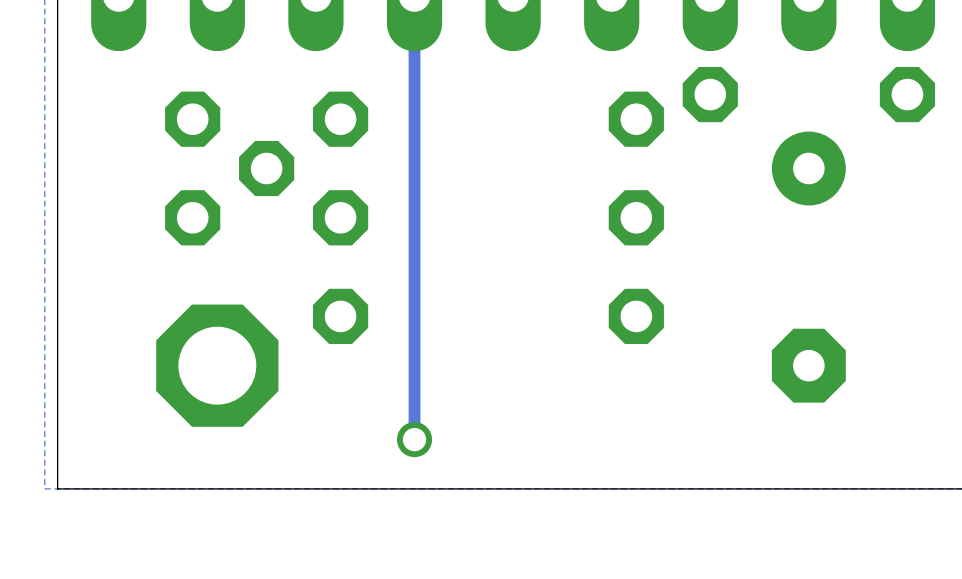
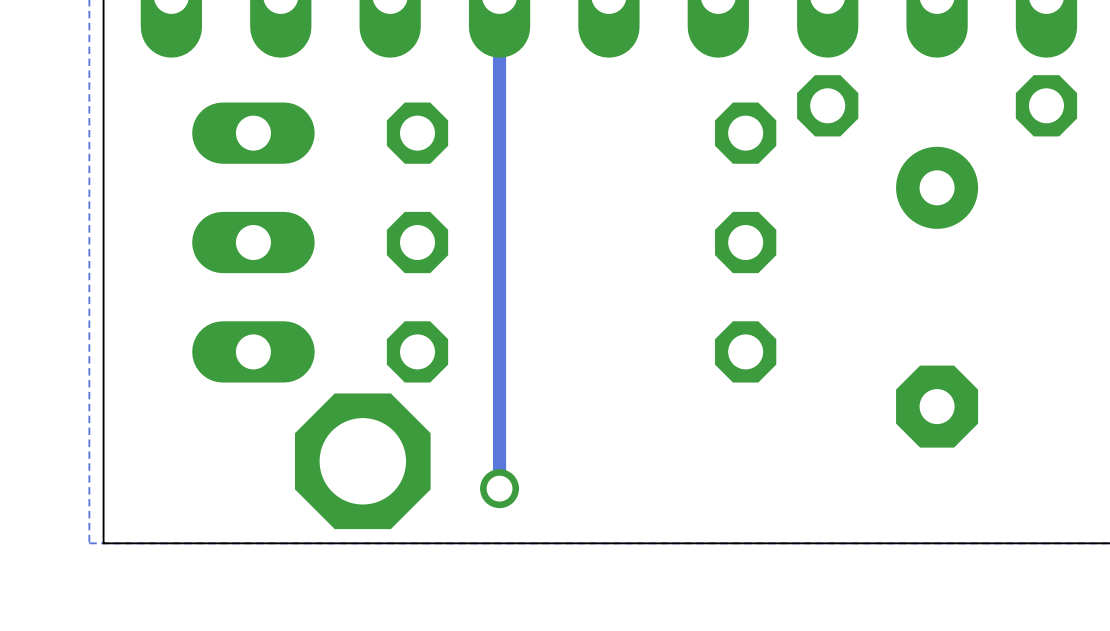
part: (229, 168) -> none
part: none -> (253, 242)
part position: (217, 365) -> (362, 461)

